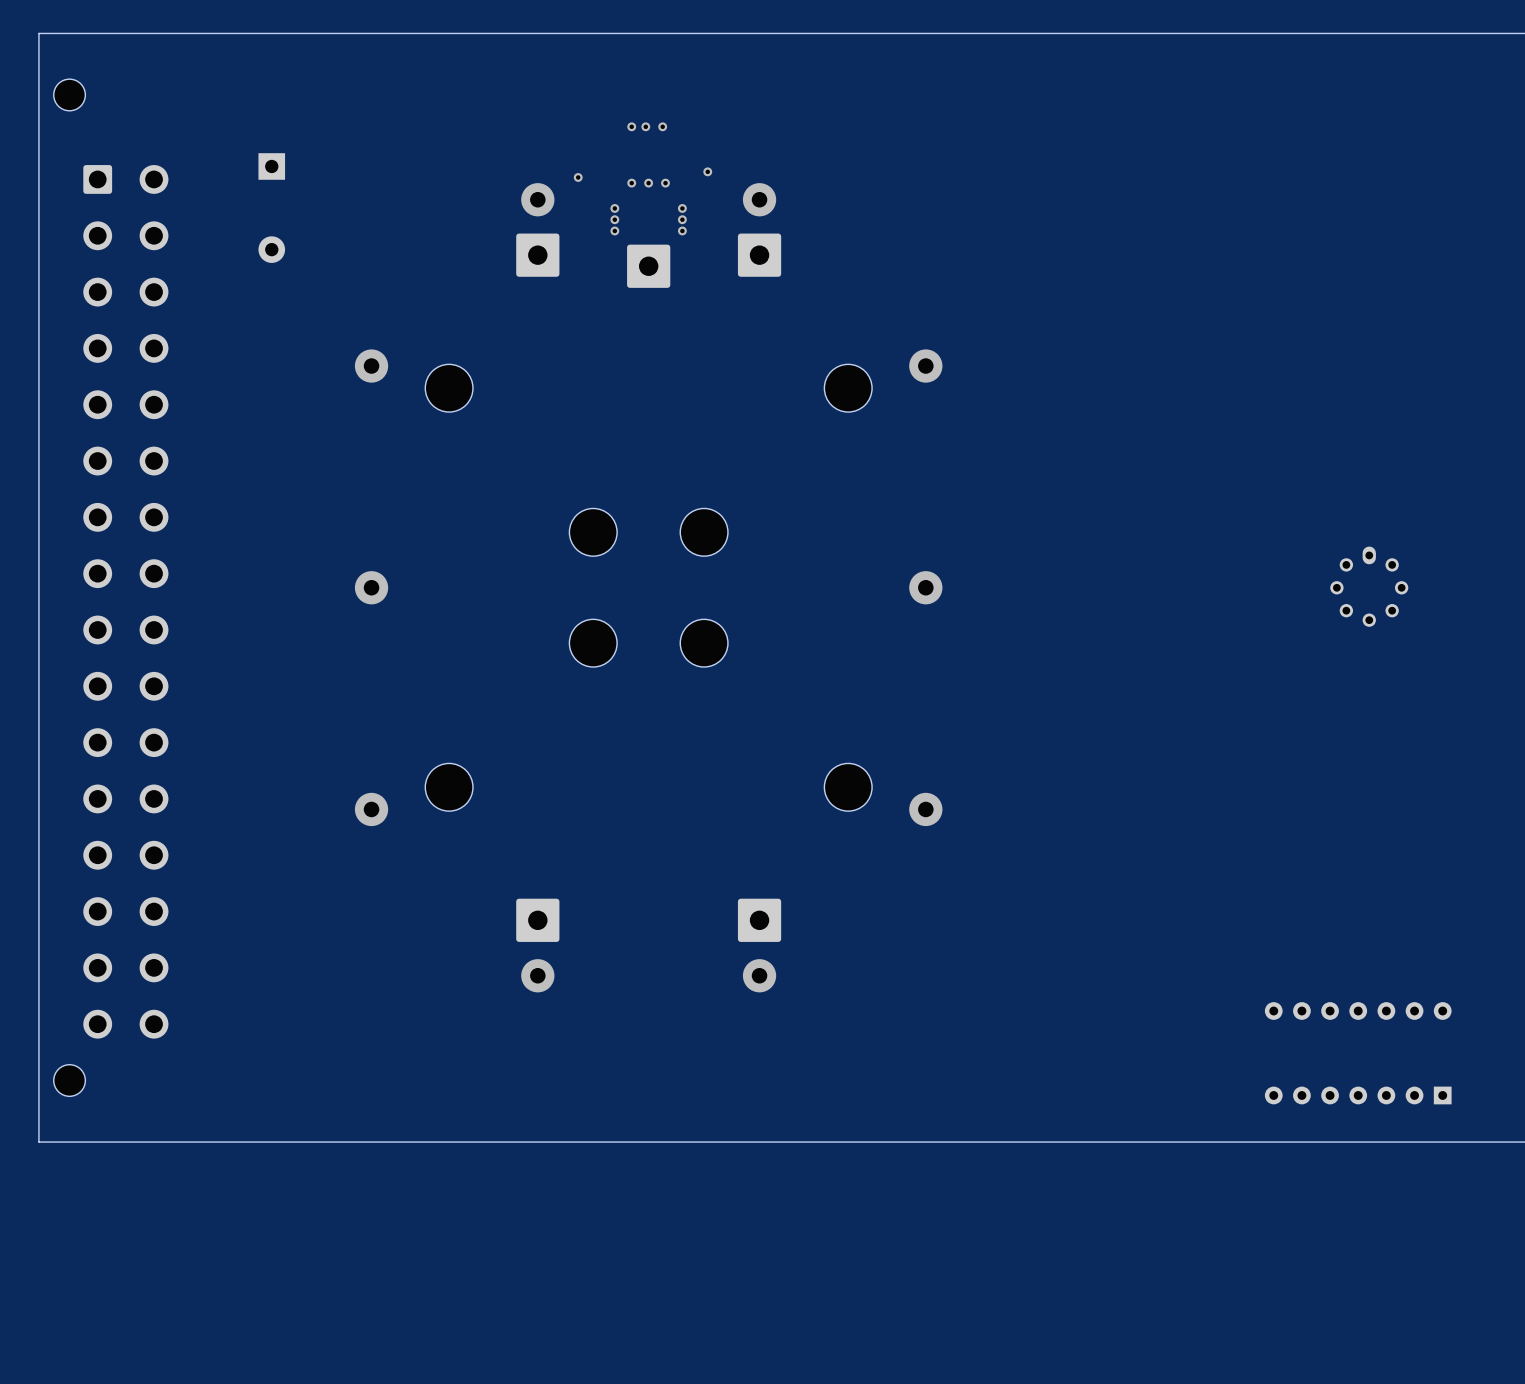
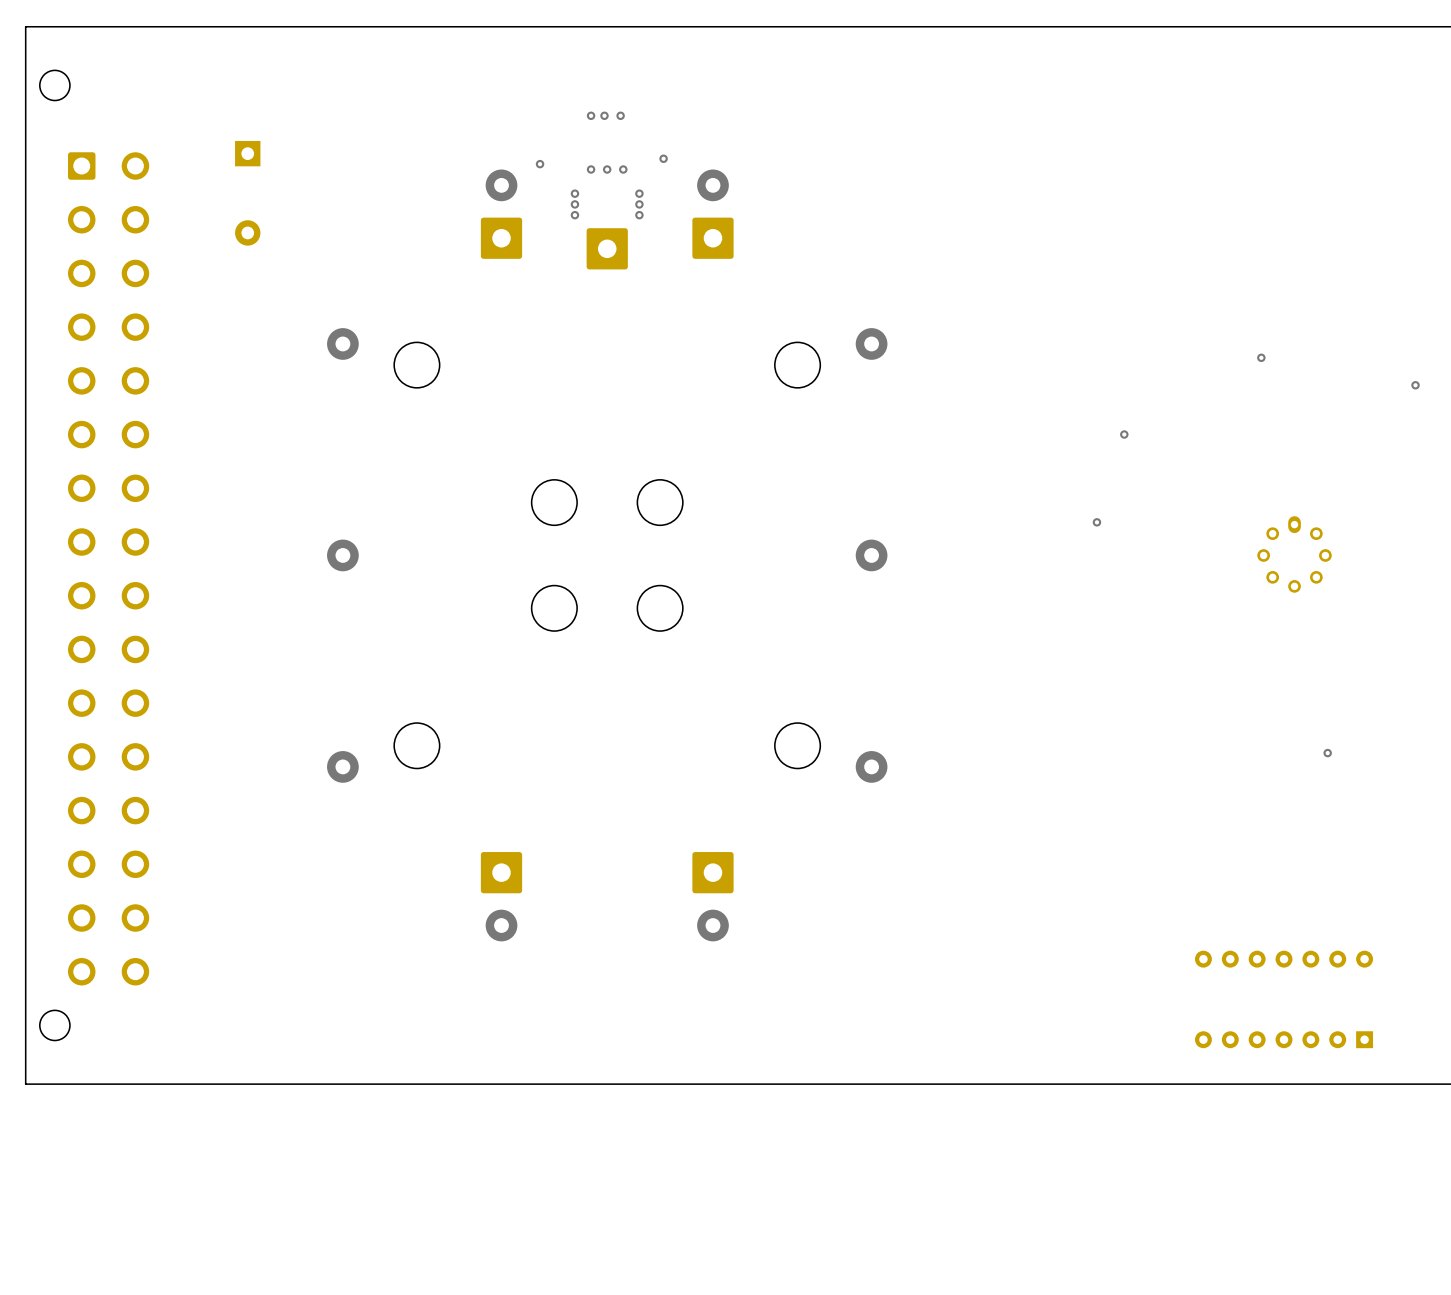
via: none -> (1261, 357)
via: none -> (1415, 385)
via: none -> (1124, 434)
via: none -> (1096, 522)
via: none -> (1327, 753)

